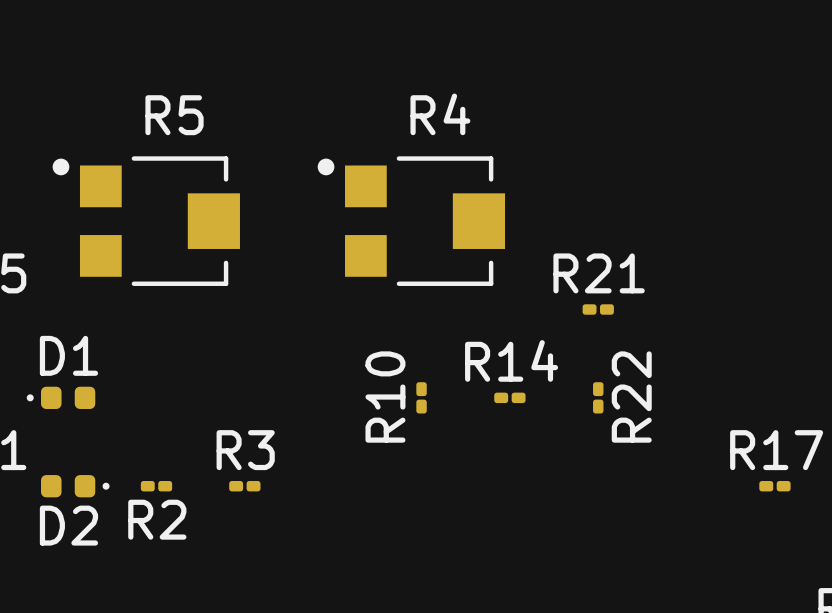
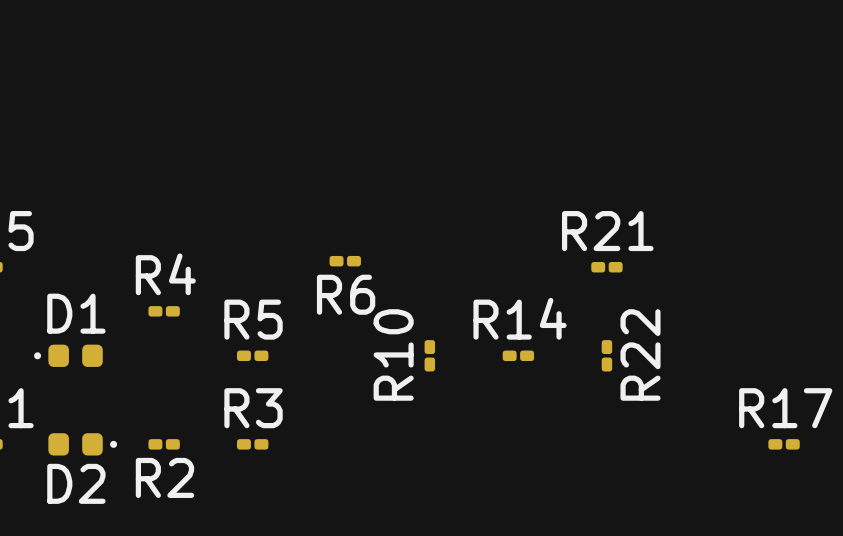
R4 name position: R4 (440, 114) -> R4 (165, 274)
R5 name position: R5 (174, 115) -> R5 (253, 319)
R5 footprint: [52, 156, 240, 286] -> [237, 350, 269, 362]
R4 footprint: [317, 156, 506, 286] -> [148, 306, 180, 317]
R6: none -> (345, 261)

